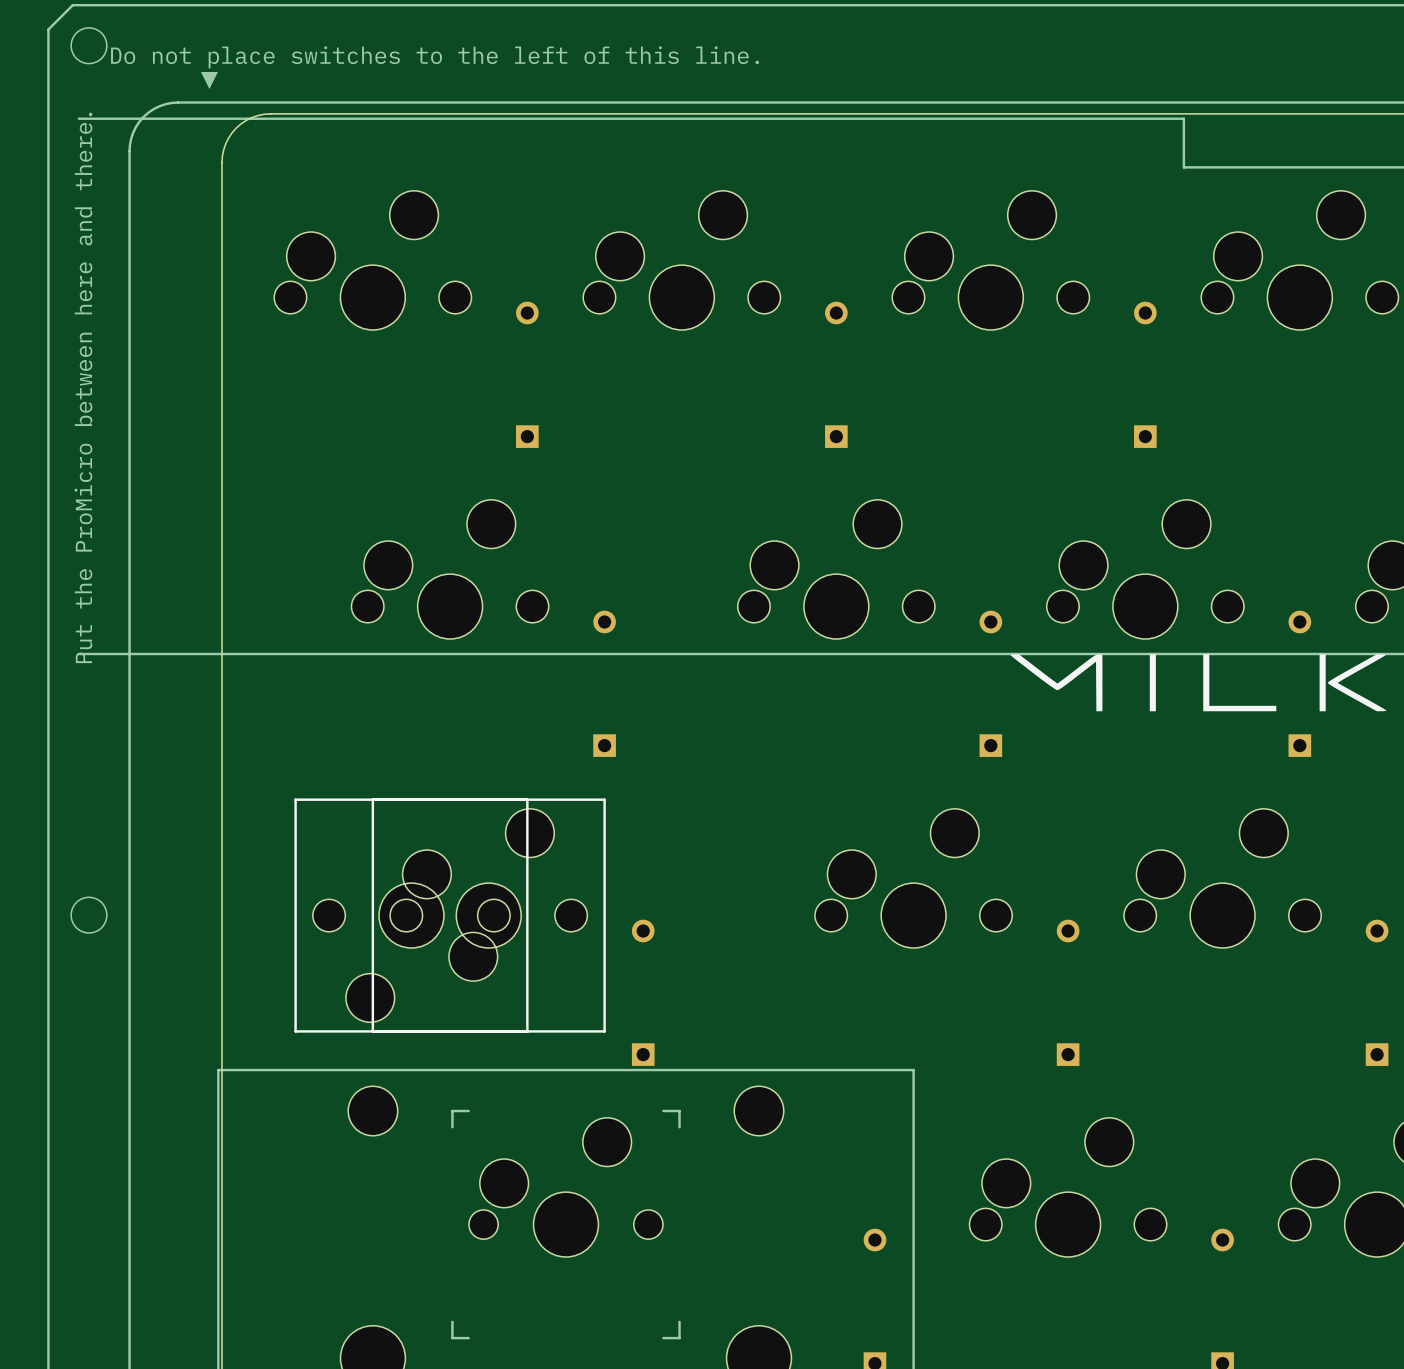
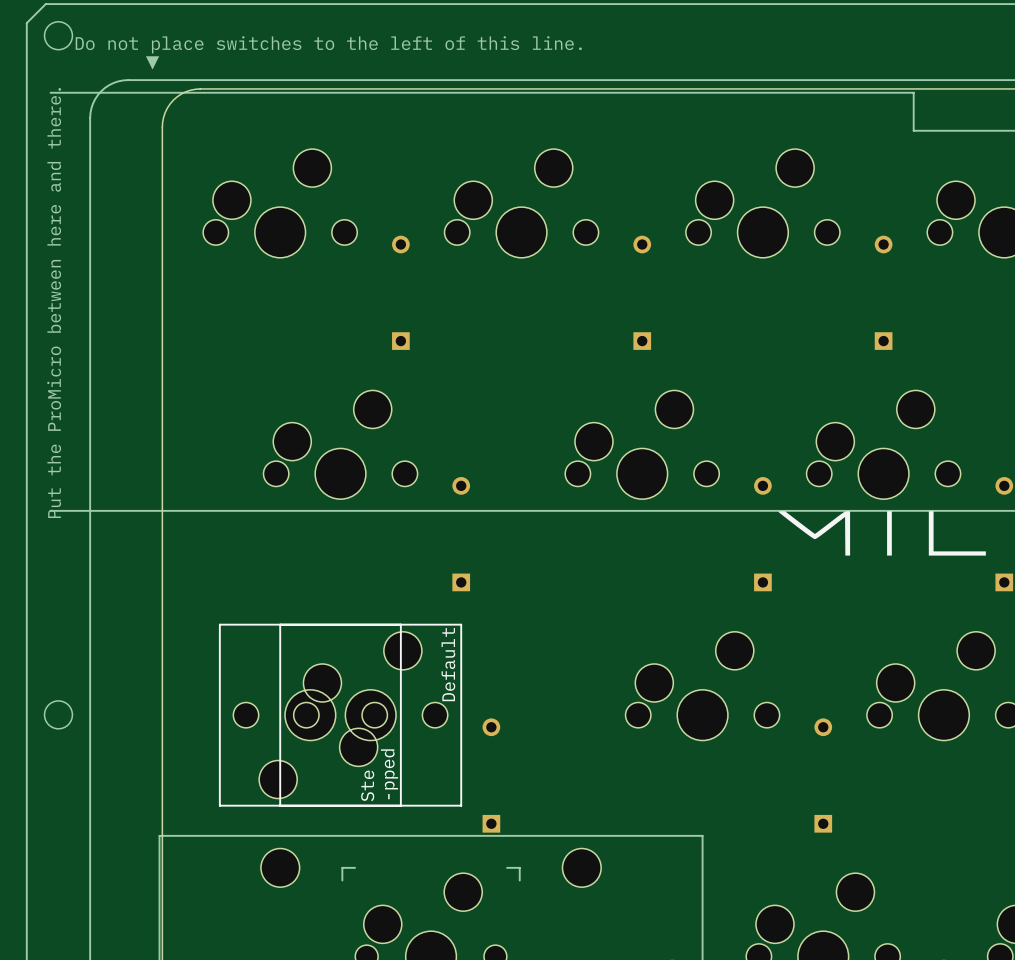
text: none -> Default (448, 664)
text: none -> -pped (389, 774)
text: none -> Ste (367, 785)

